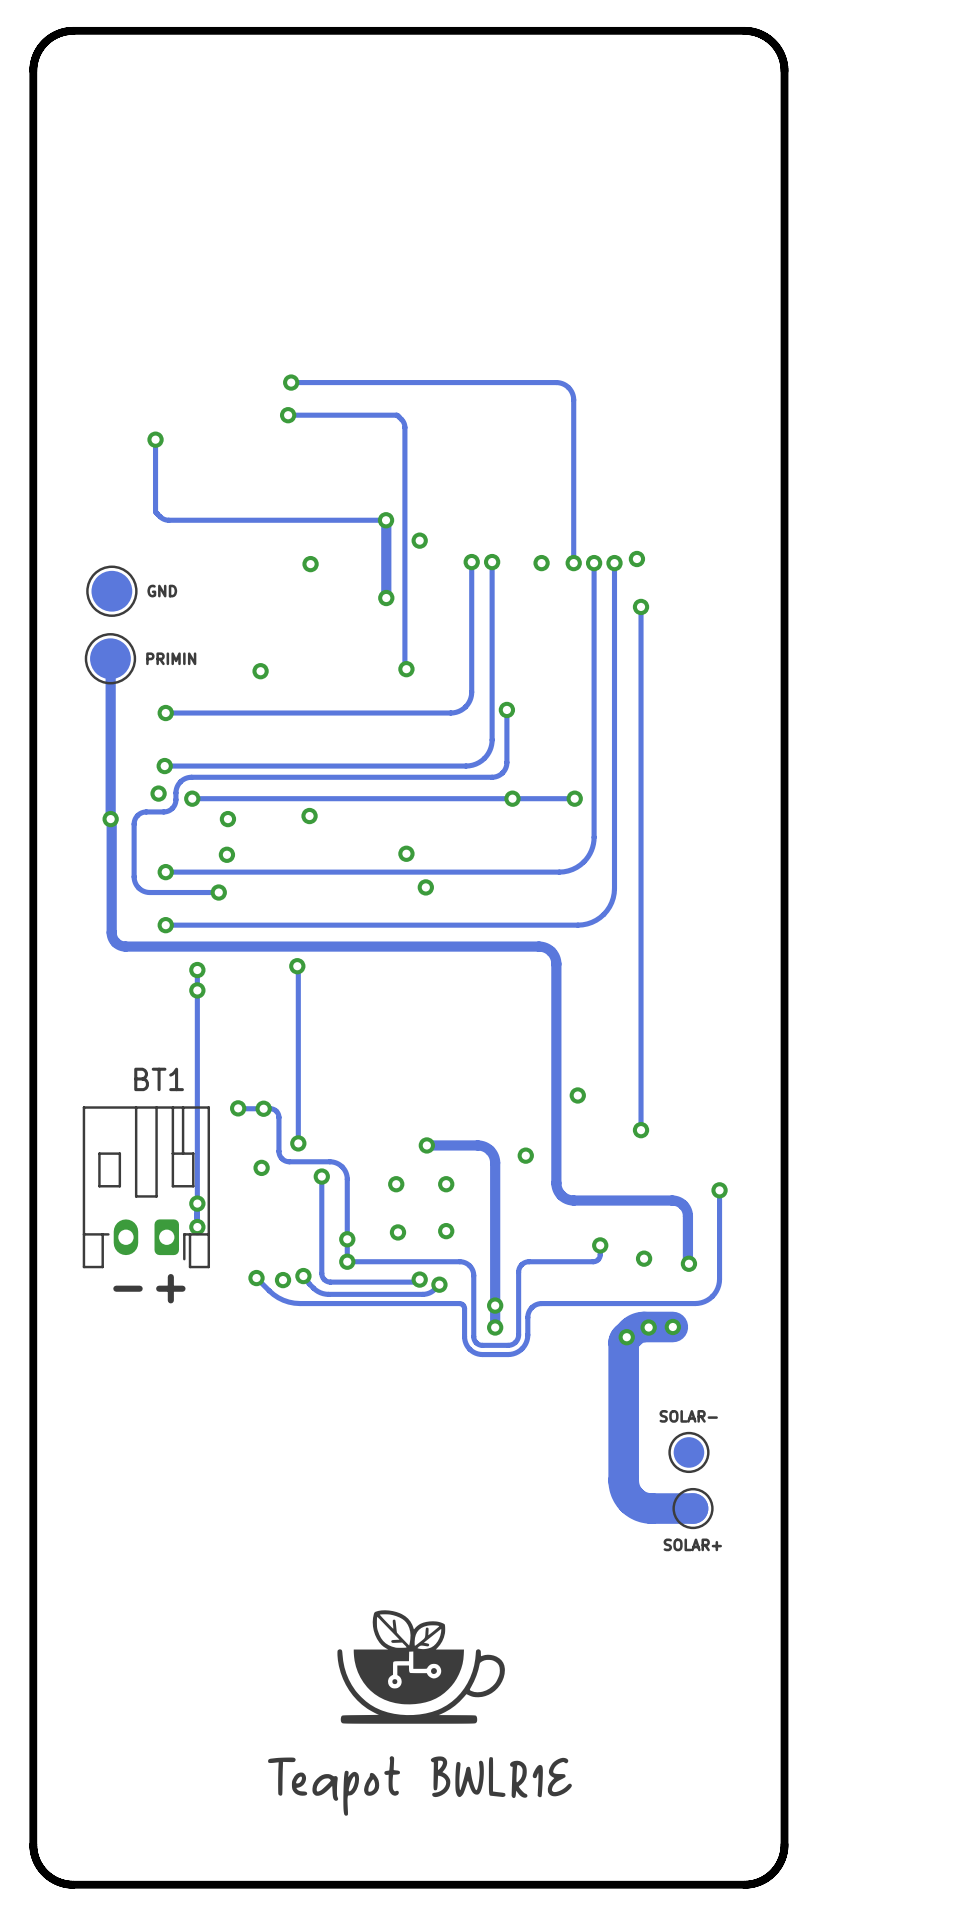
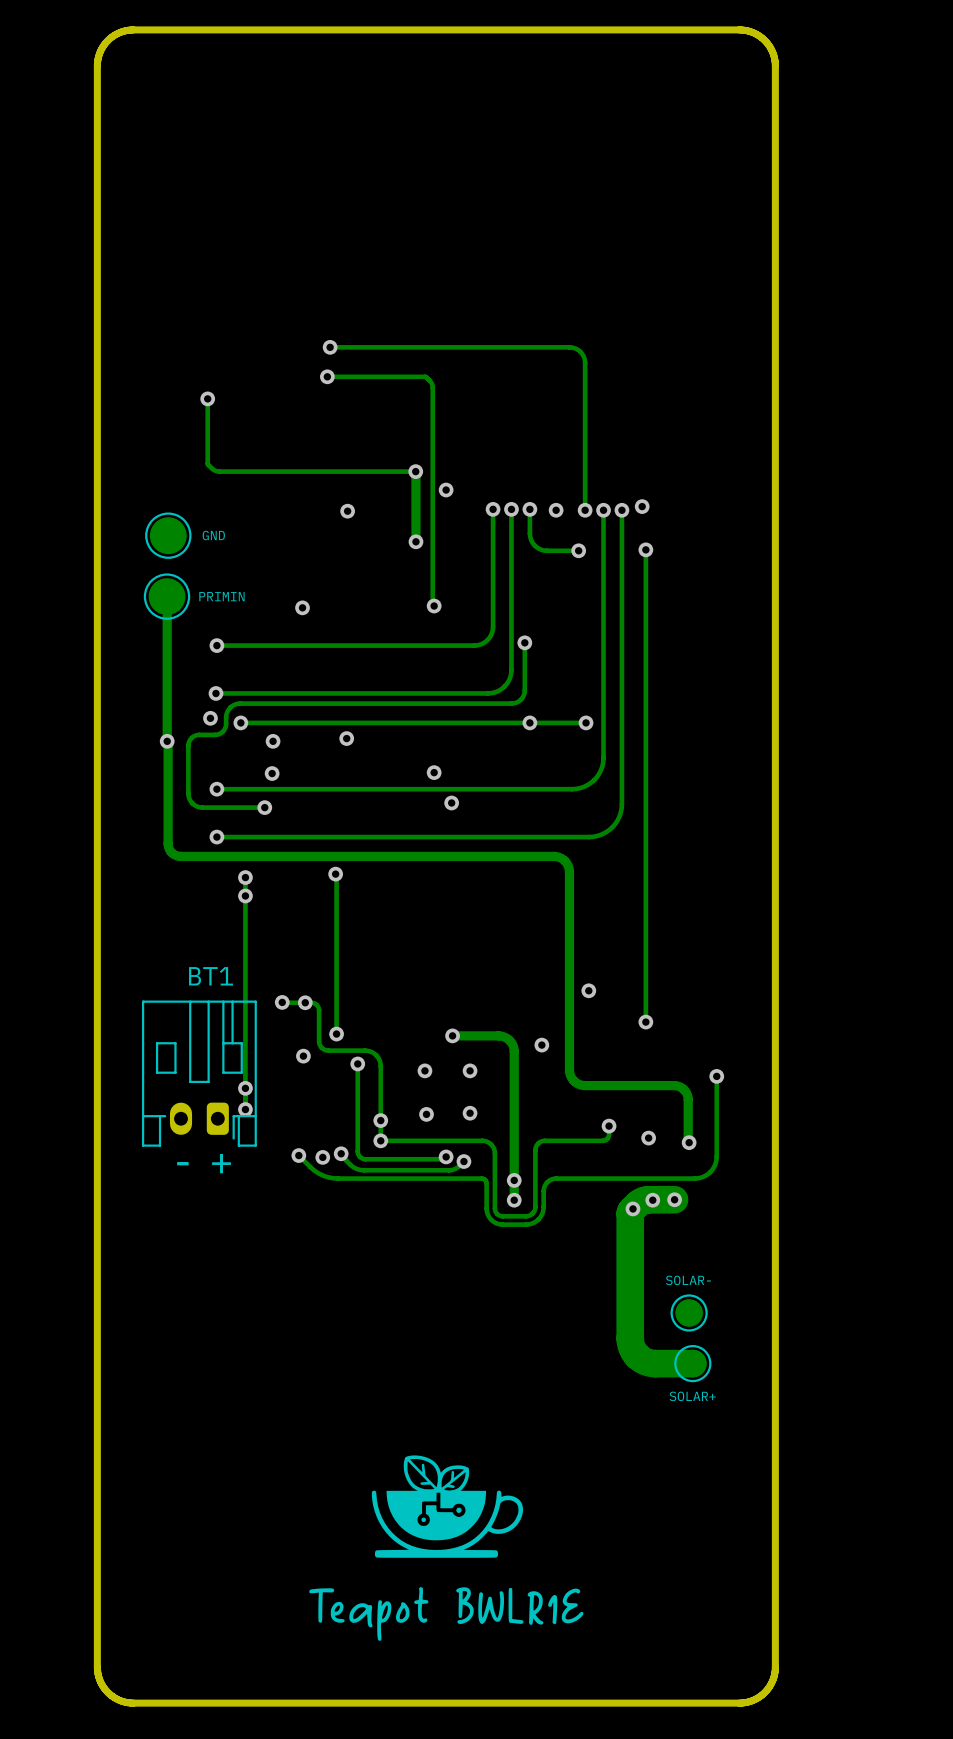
track: none -> (529, 509) (530, 535) (536, 547) (544, 550) (578, 550)
via: none -> (529, 509)
via: none -> (578, 550)

